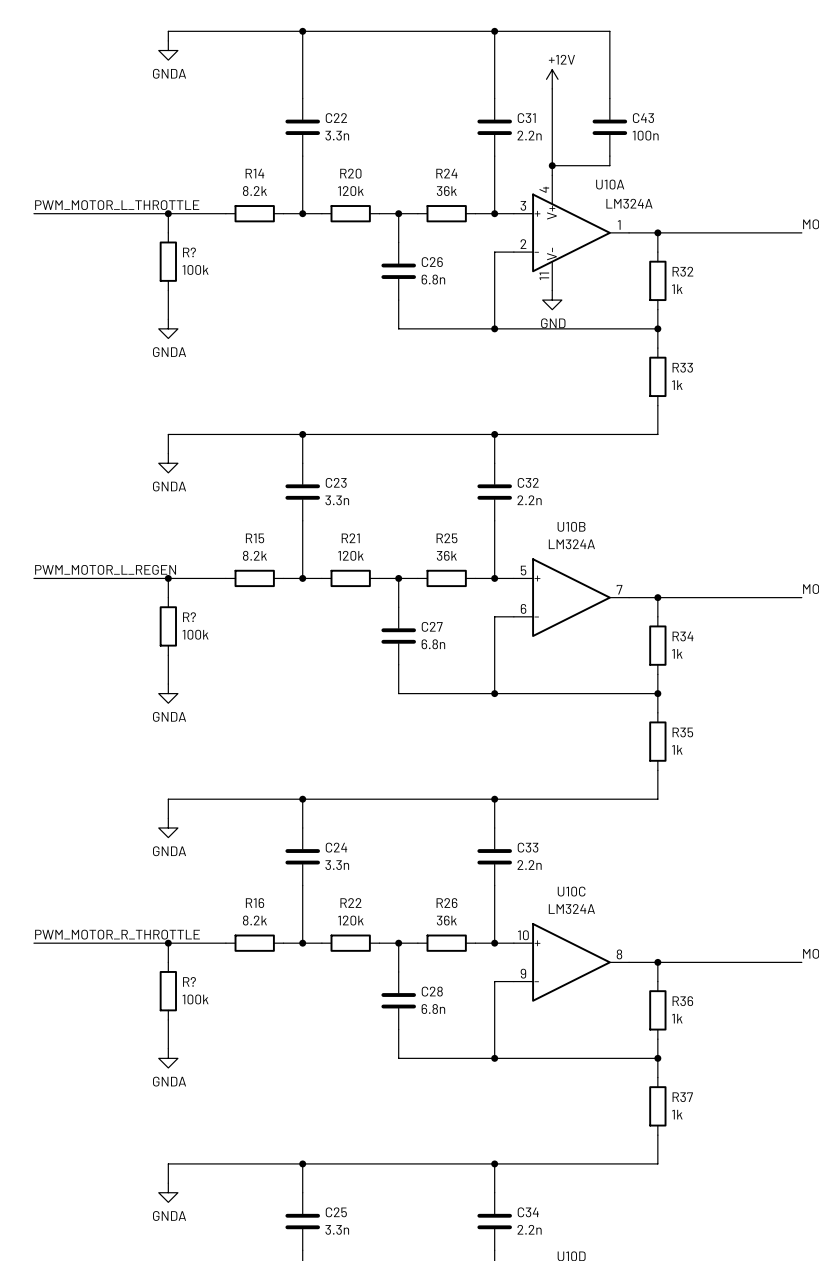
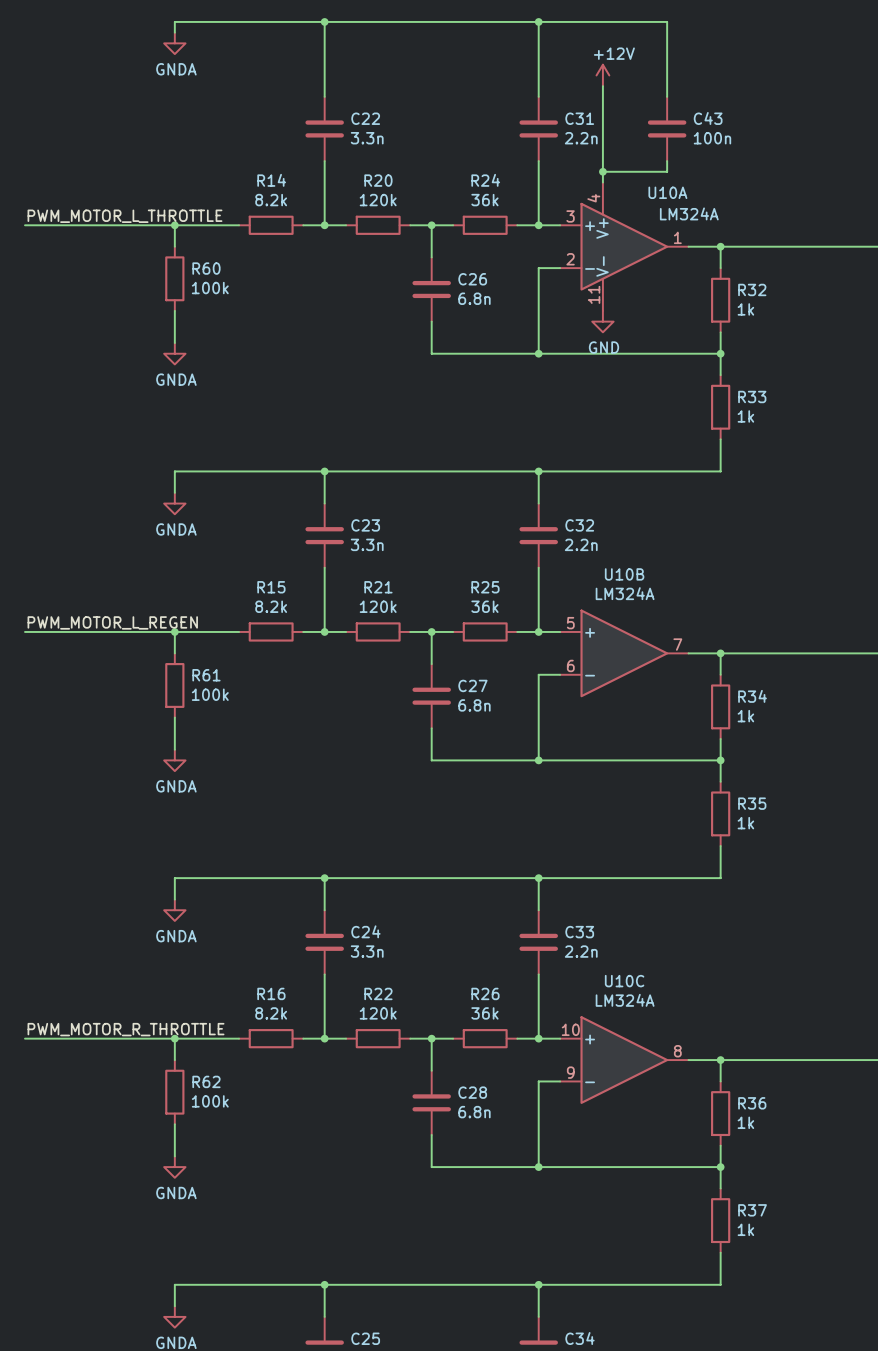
R? name: R? (189, 252) -> R60 (206, 268)
R? name: R? (189, 617) -> R61 (206, 675)
R? name: R? (189, 981) -> R62 (206, 1081)

